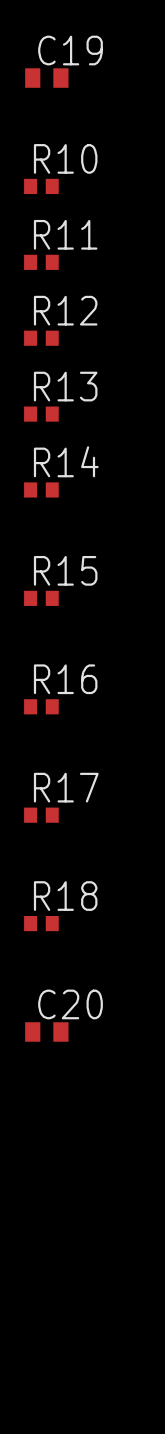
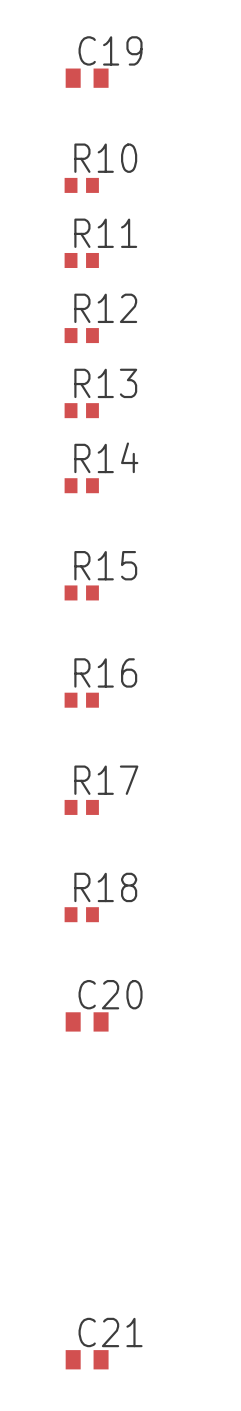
C21: none -> (87, 1359)

